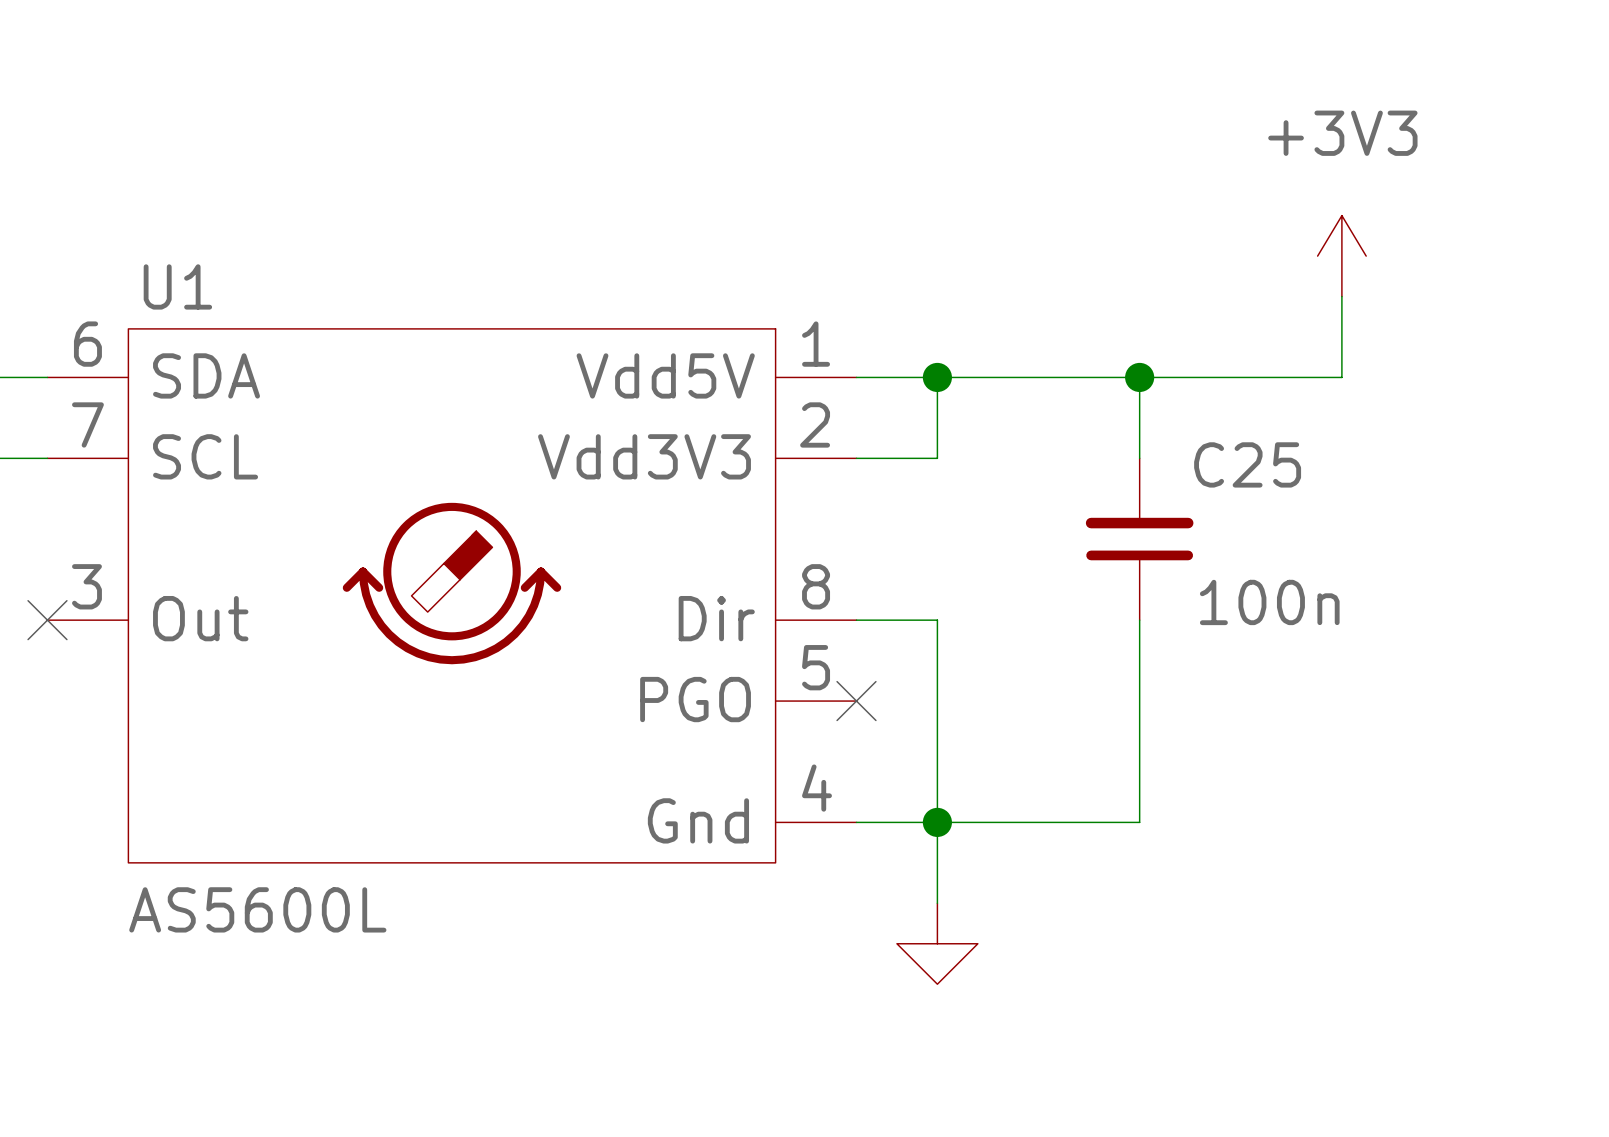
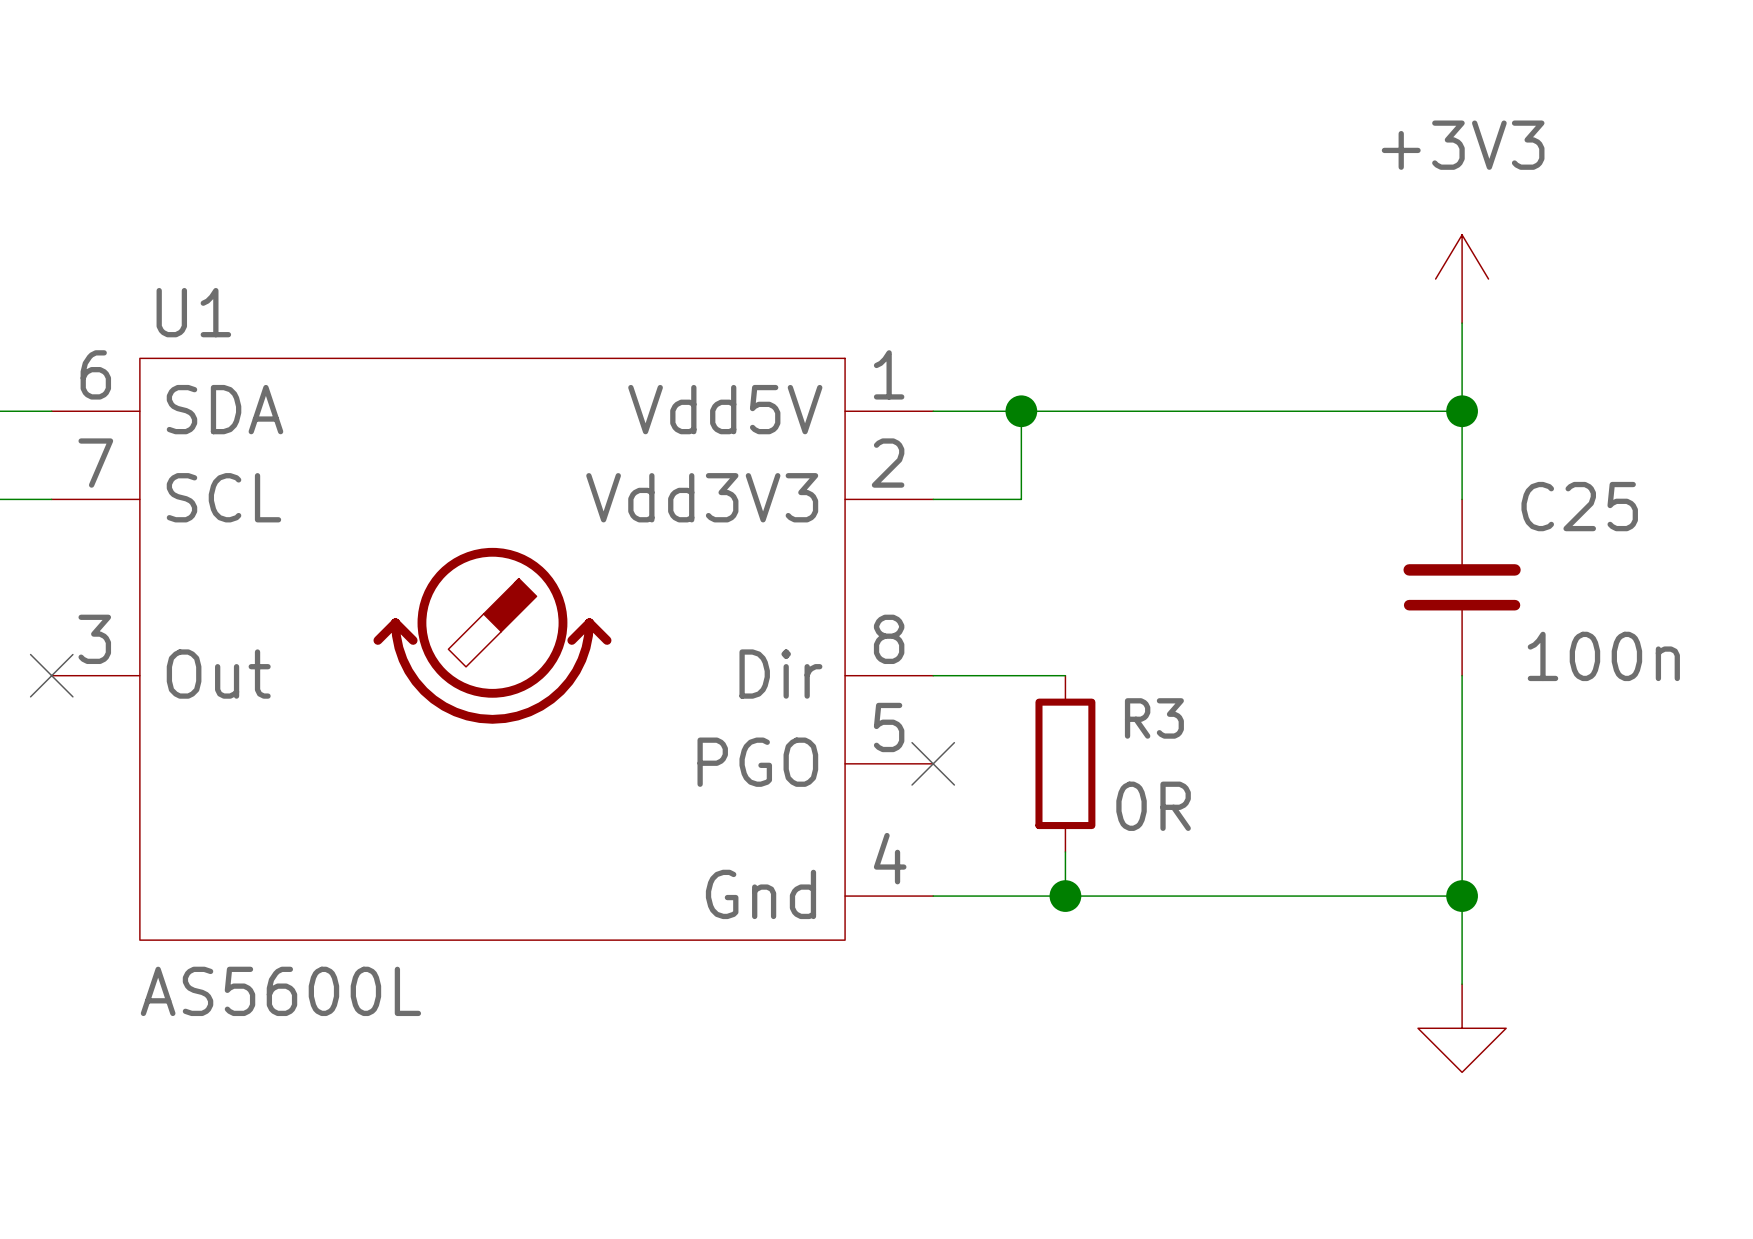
wire: (1139, 377) (1139, 458) -> (1462, 411) (1462, 499)
junction: (1139, 377) -> none
junction: none -> (1462, 411)
C25 position: (1139, 539) -> (1462, 587)
wire: (937, 620) (937, 903) -> (1021, 675) (1065, 675)
wire: (1139, 620) (1139, 822) -> (1462, 896) (1241, 896)
wire: none -> (1462, 675) (1462, 984)
R3: none -> 0R (1065, 763)
wire: none -> (1065, 851) (1065, 896)
junction position: (937, 822) -> (1065, 896)
junction: none -> (1462, 896)
power symbol position: (937, 943) -> (1462, 1028)

